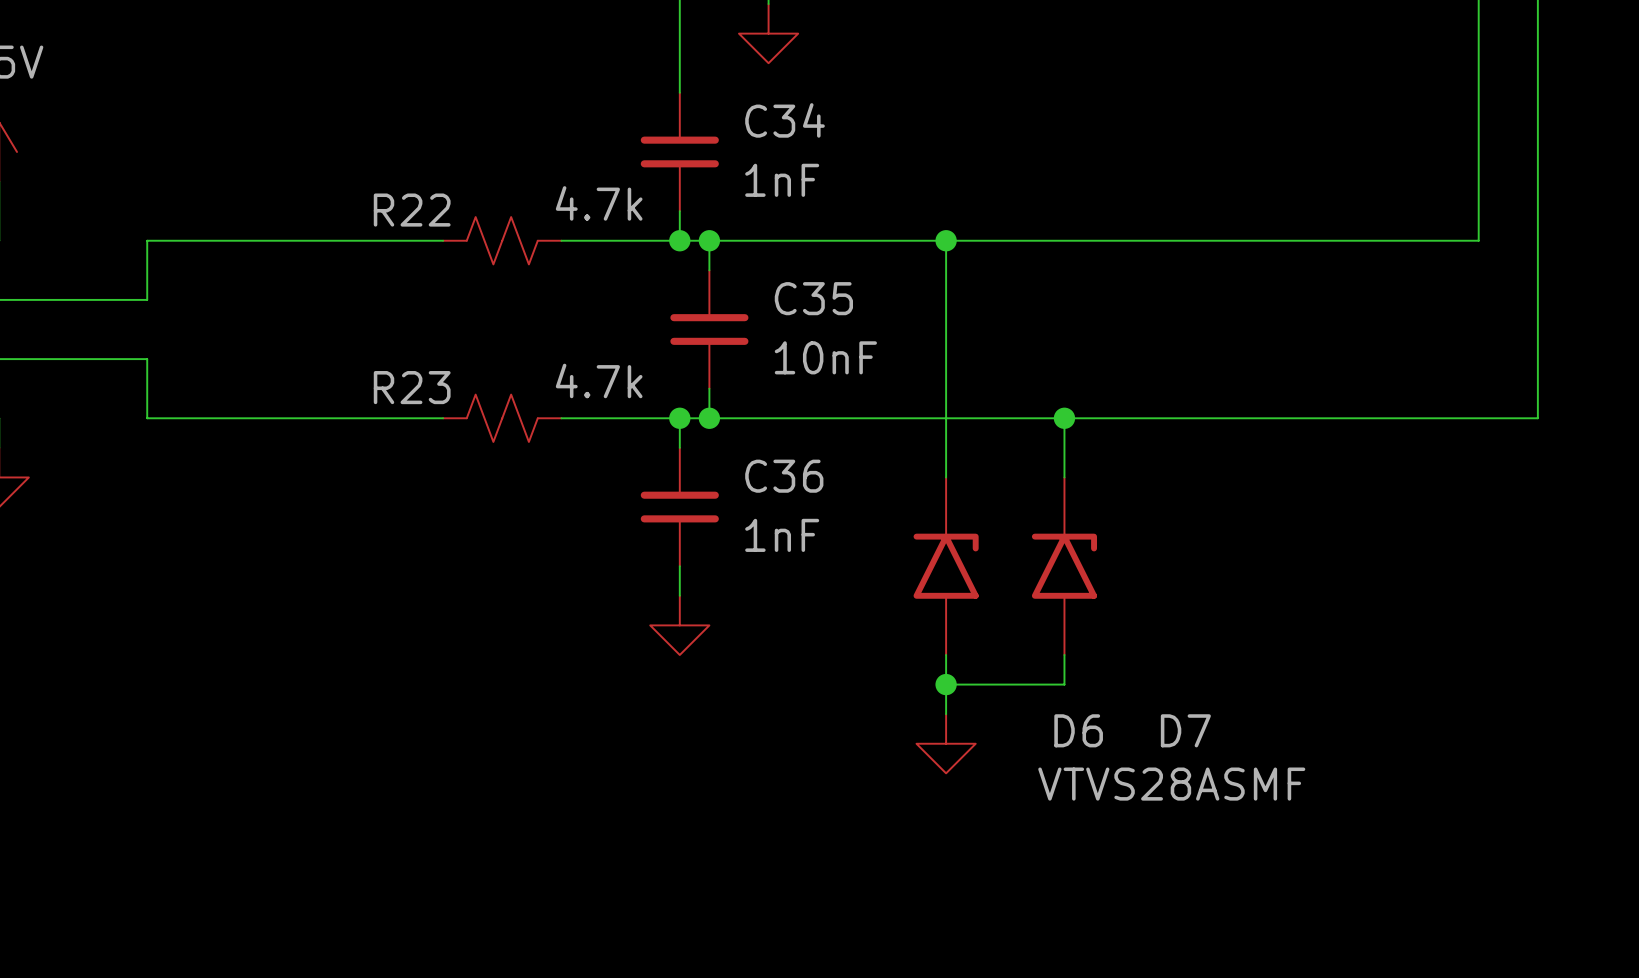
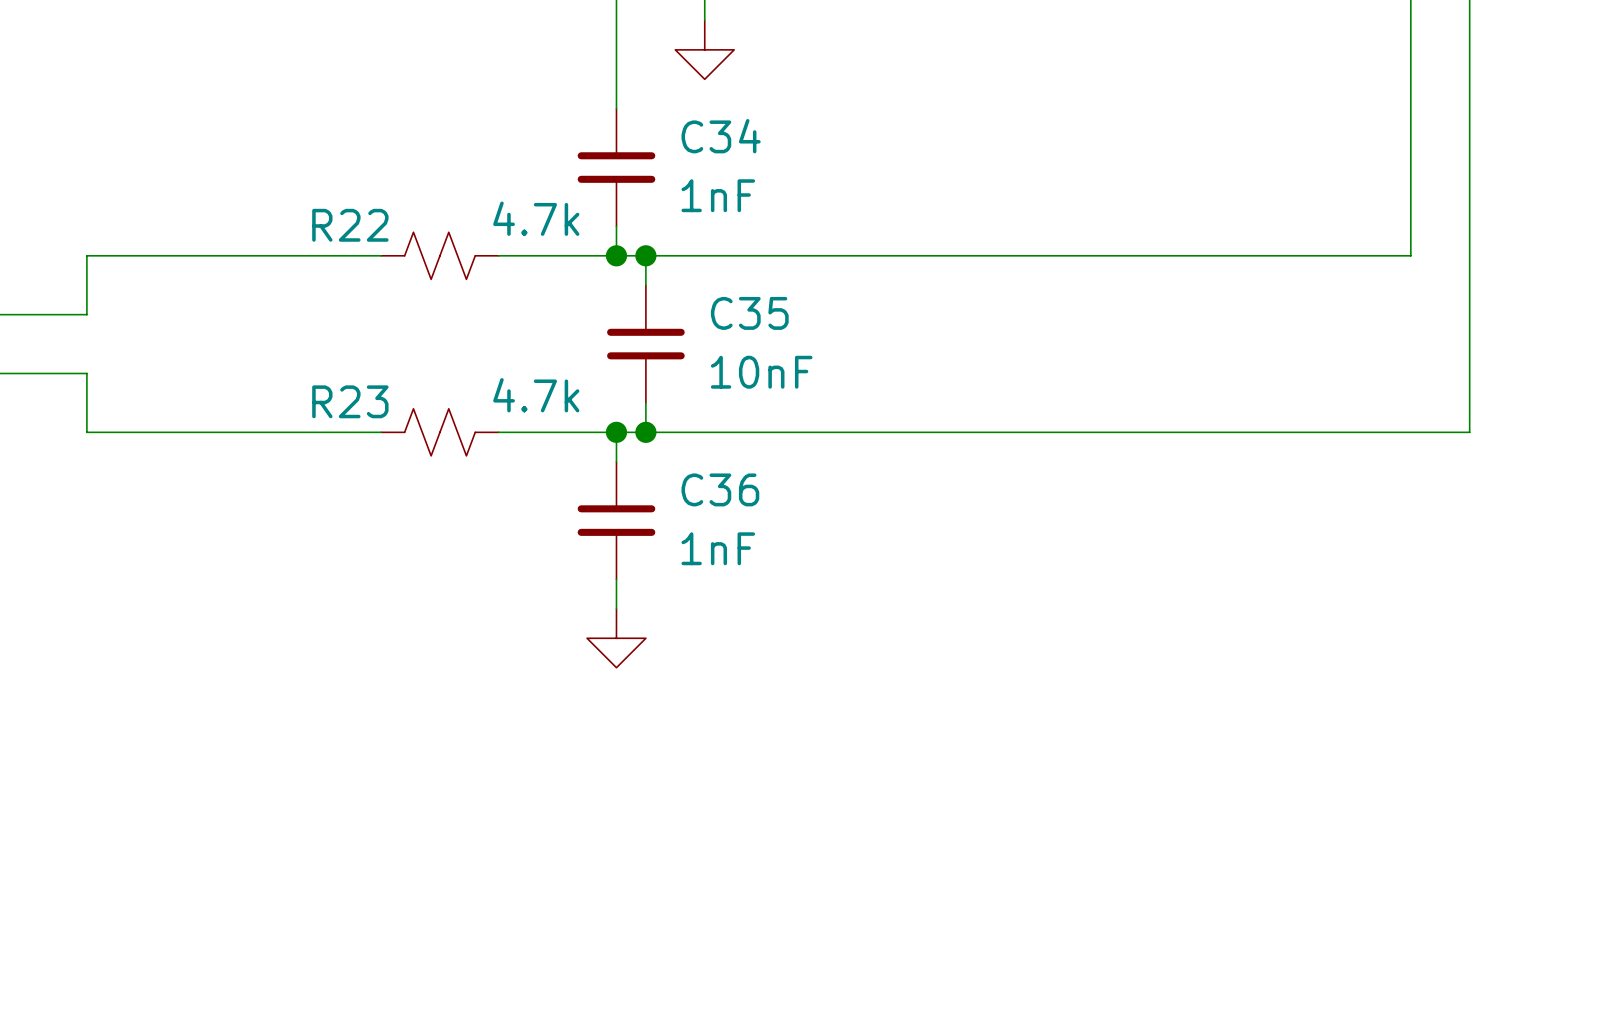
wire: (946, 240) (946, 477) -> none
junction: (946, 240) -> none
wire: (1064, 418) (1064, 477) -> none
junction: (1064, 418) -> none
D6: (946, 566) -> none
D7: VTVS28ASMF (1064, 566) -> none
wire: (946, 654) (946, 714) -> none
wire: (1064, 654) (1064, 684) (946, 684) -> none
junction: (946, 684) -> none
power symbol: (946, 743) -> none

